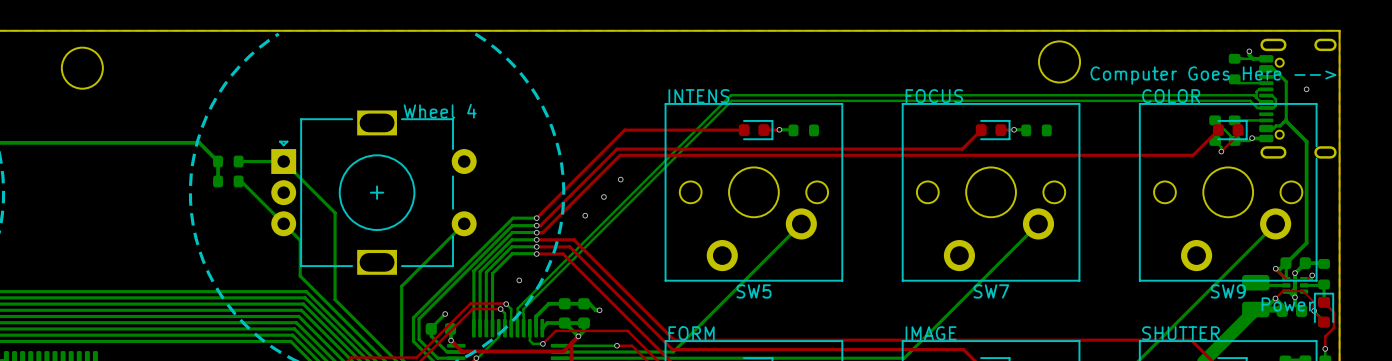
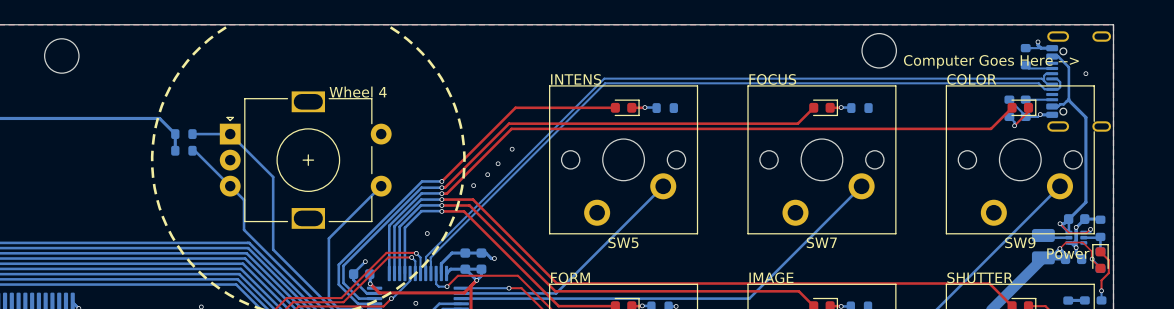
via: none -> (487, 174)
via: (585, 215) -> none
via: none -> (473, 185)

